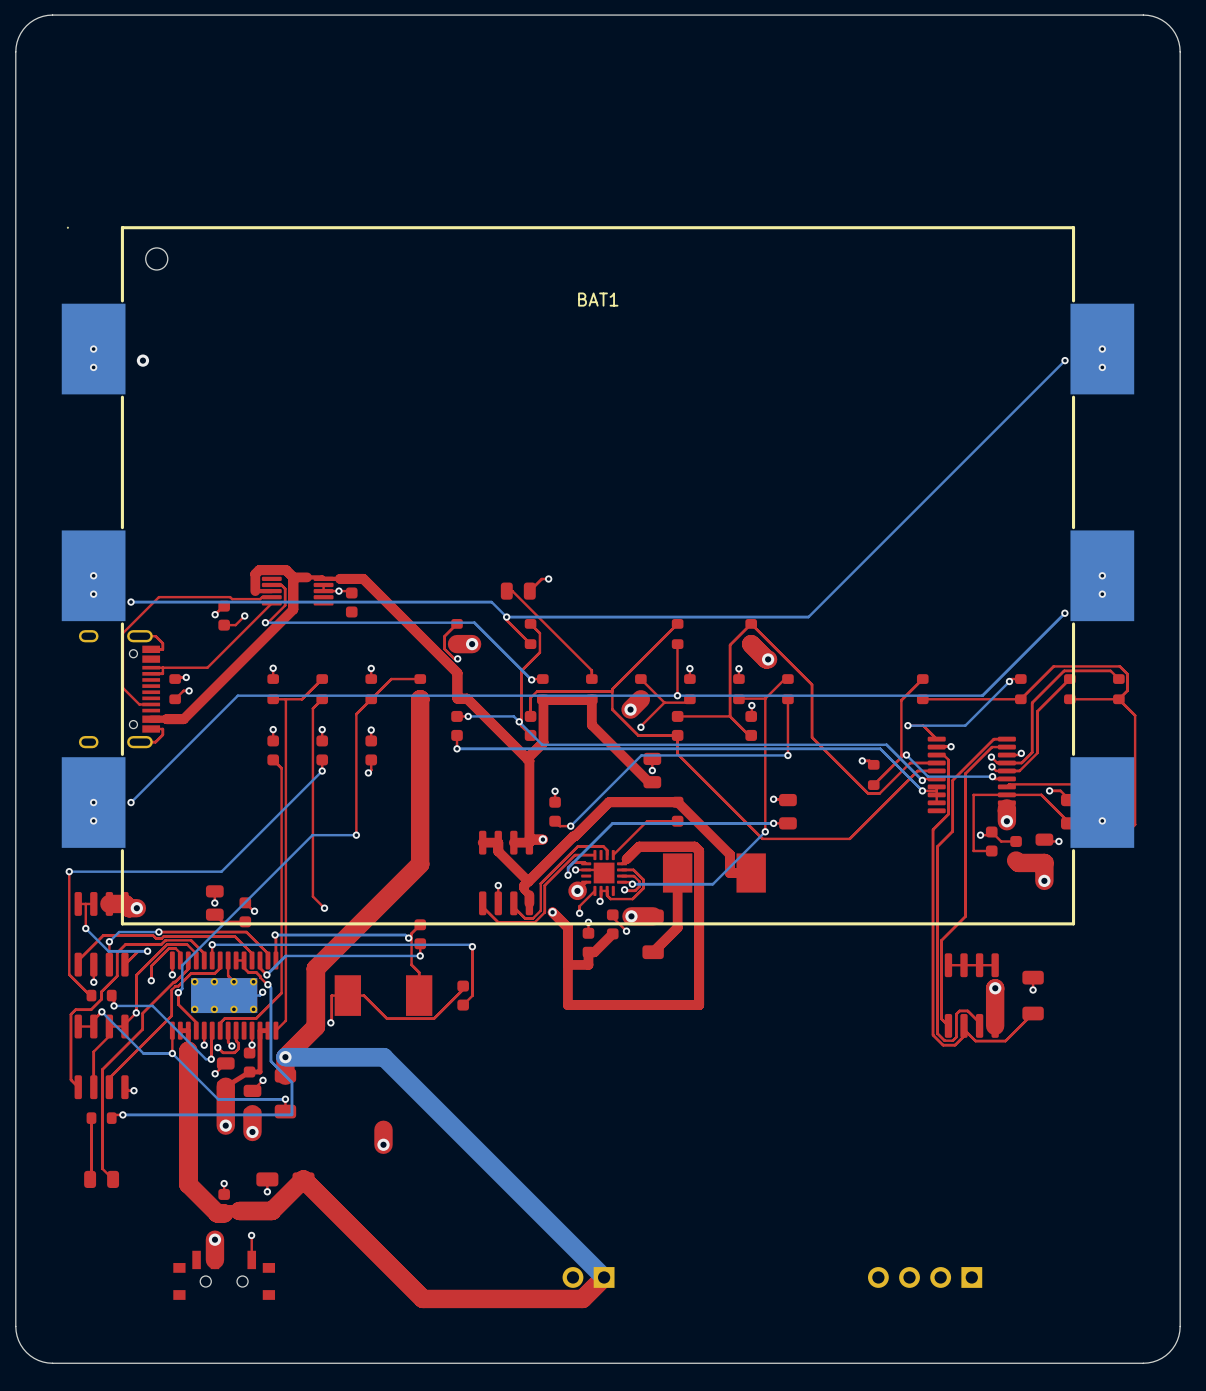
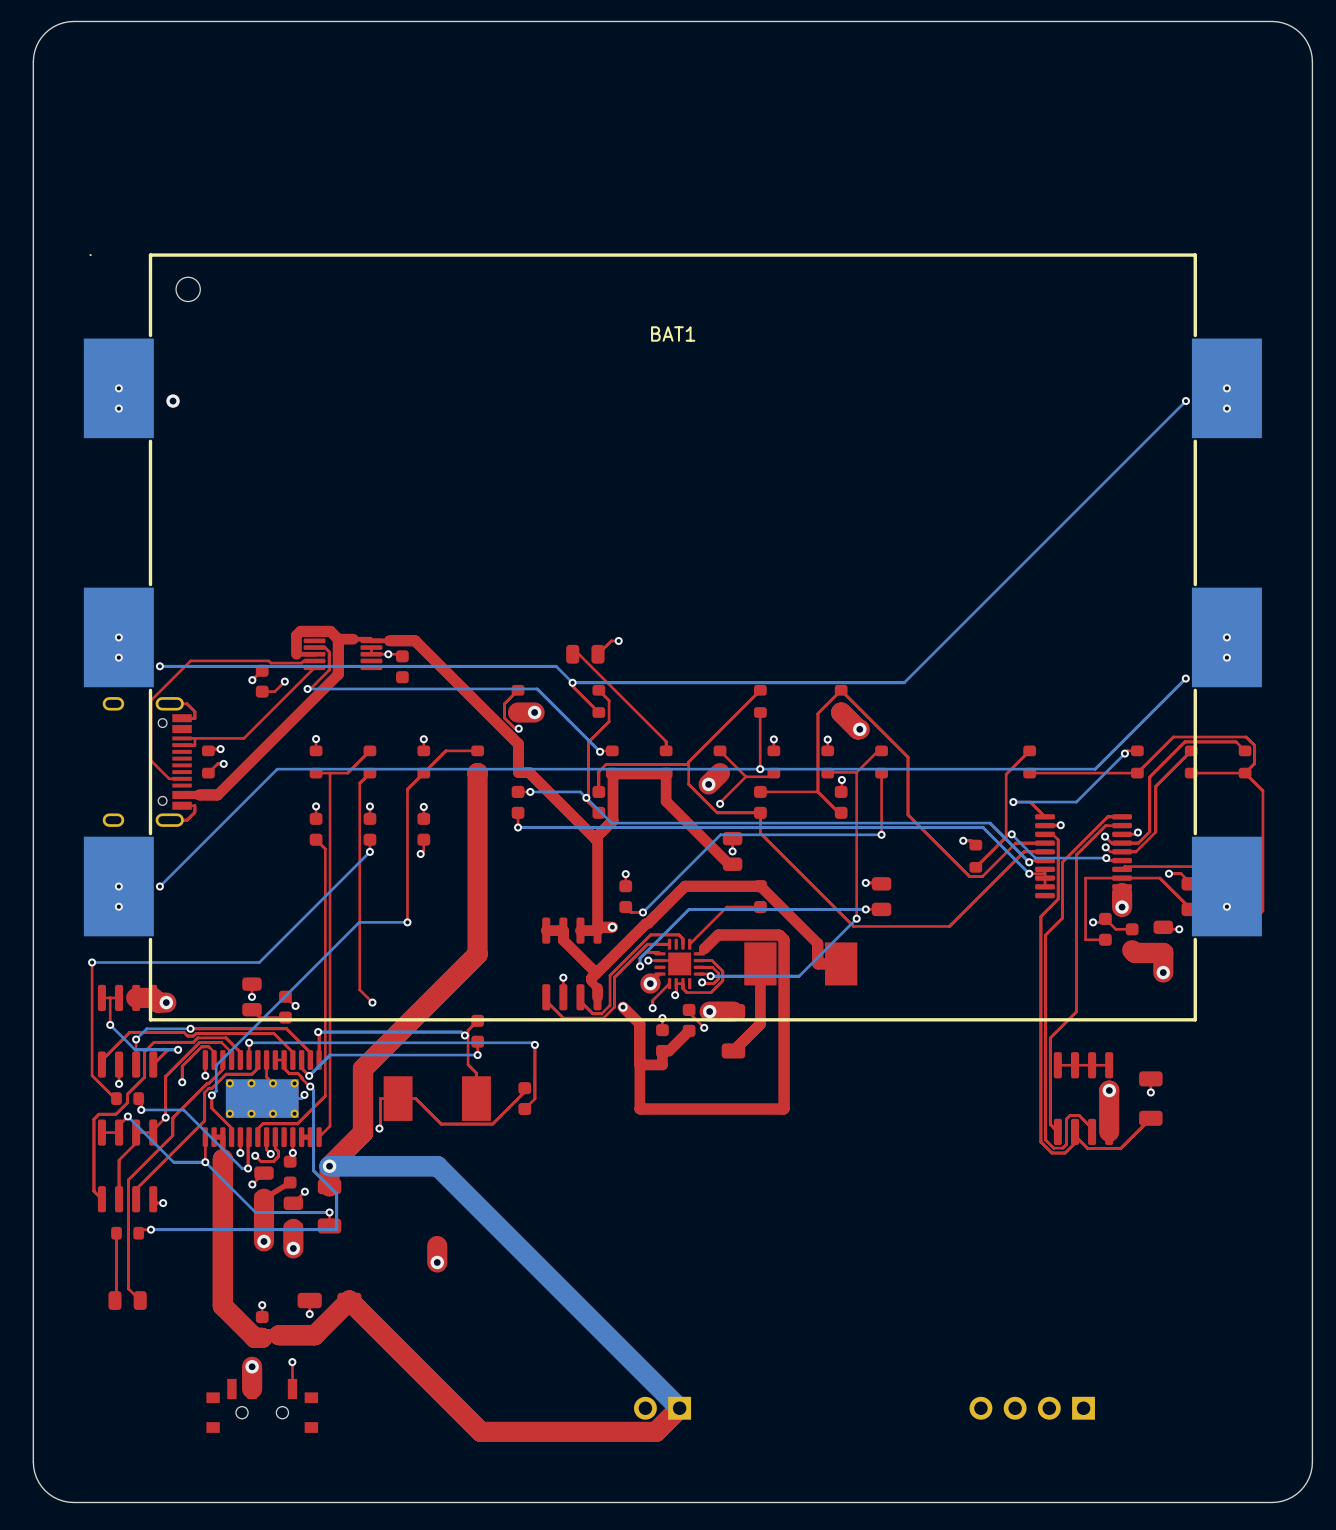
top track: (260, 1030) (260, 1071) (249, 1071) -> none

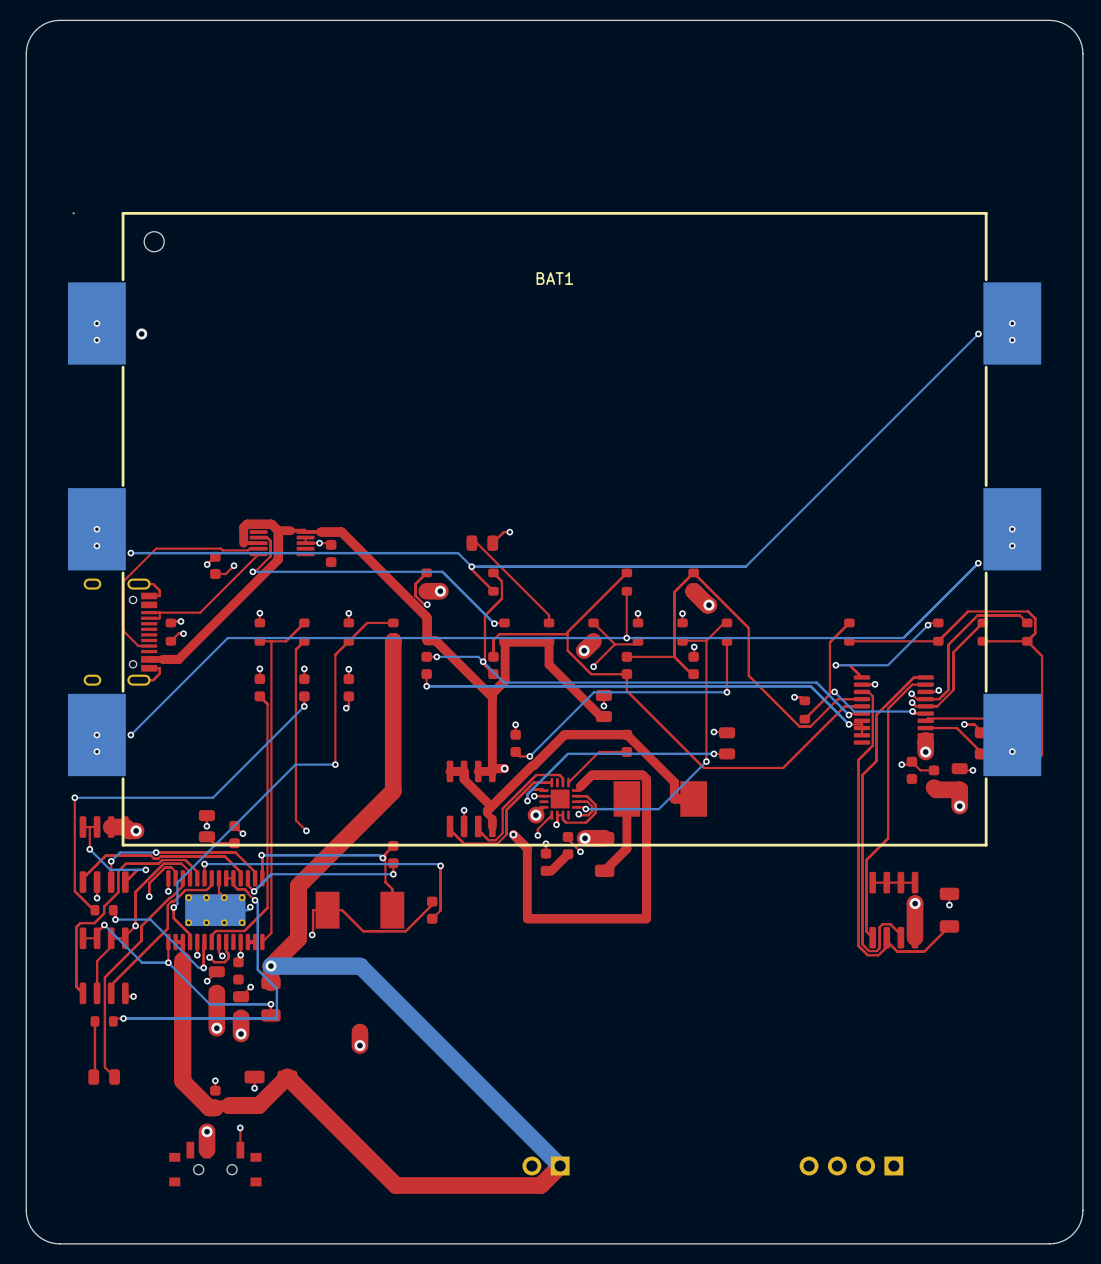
top track: (1122, 878) (1085, 878) (1085, 939) (1105, 939) -> none
top track: (662, 1051) (662, 1064) (639, 1064) -> none
top track: (290, 1182) (263, 1198) -> none

